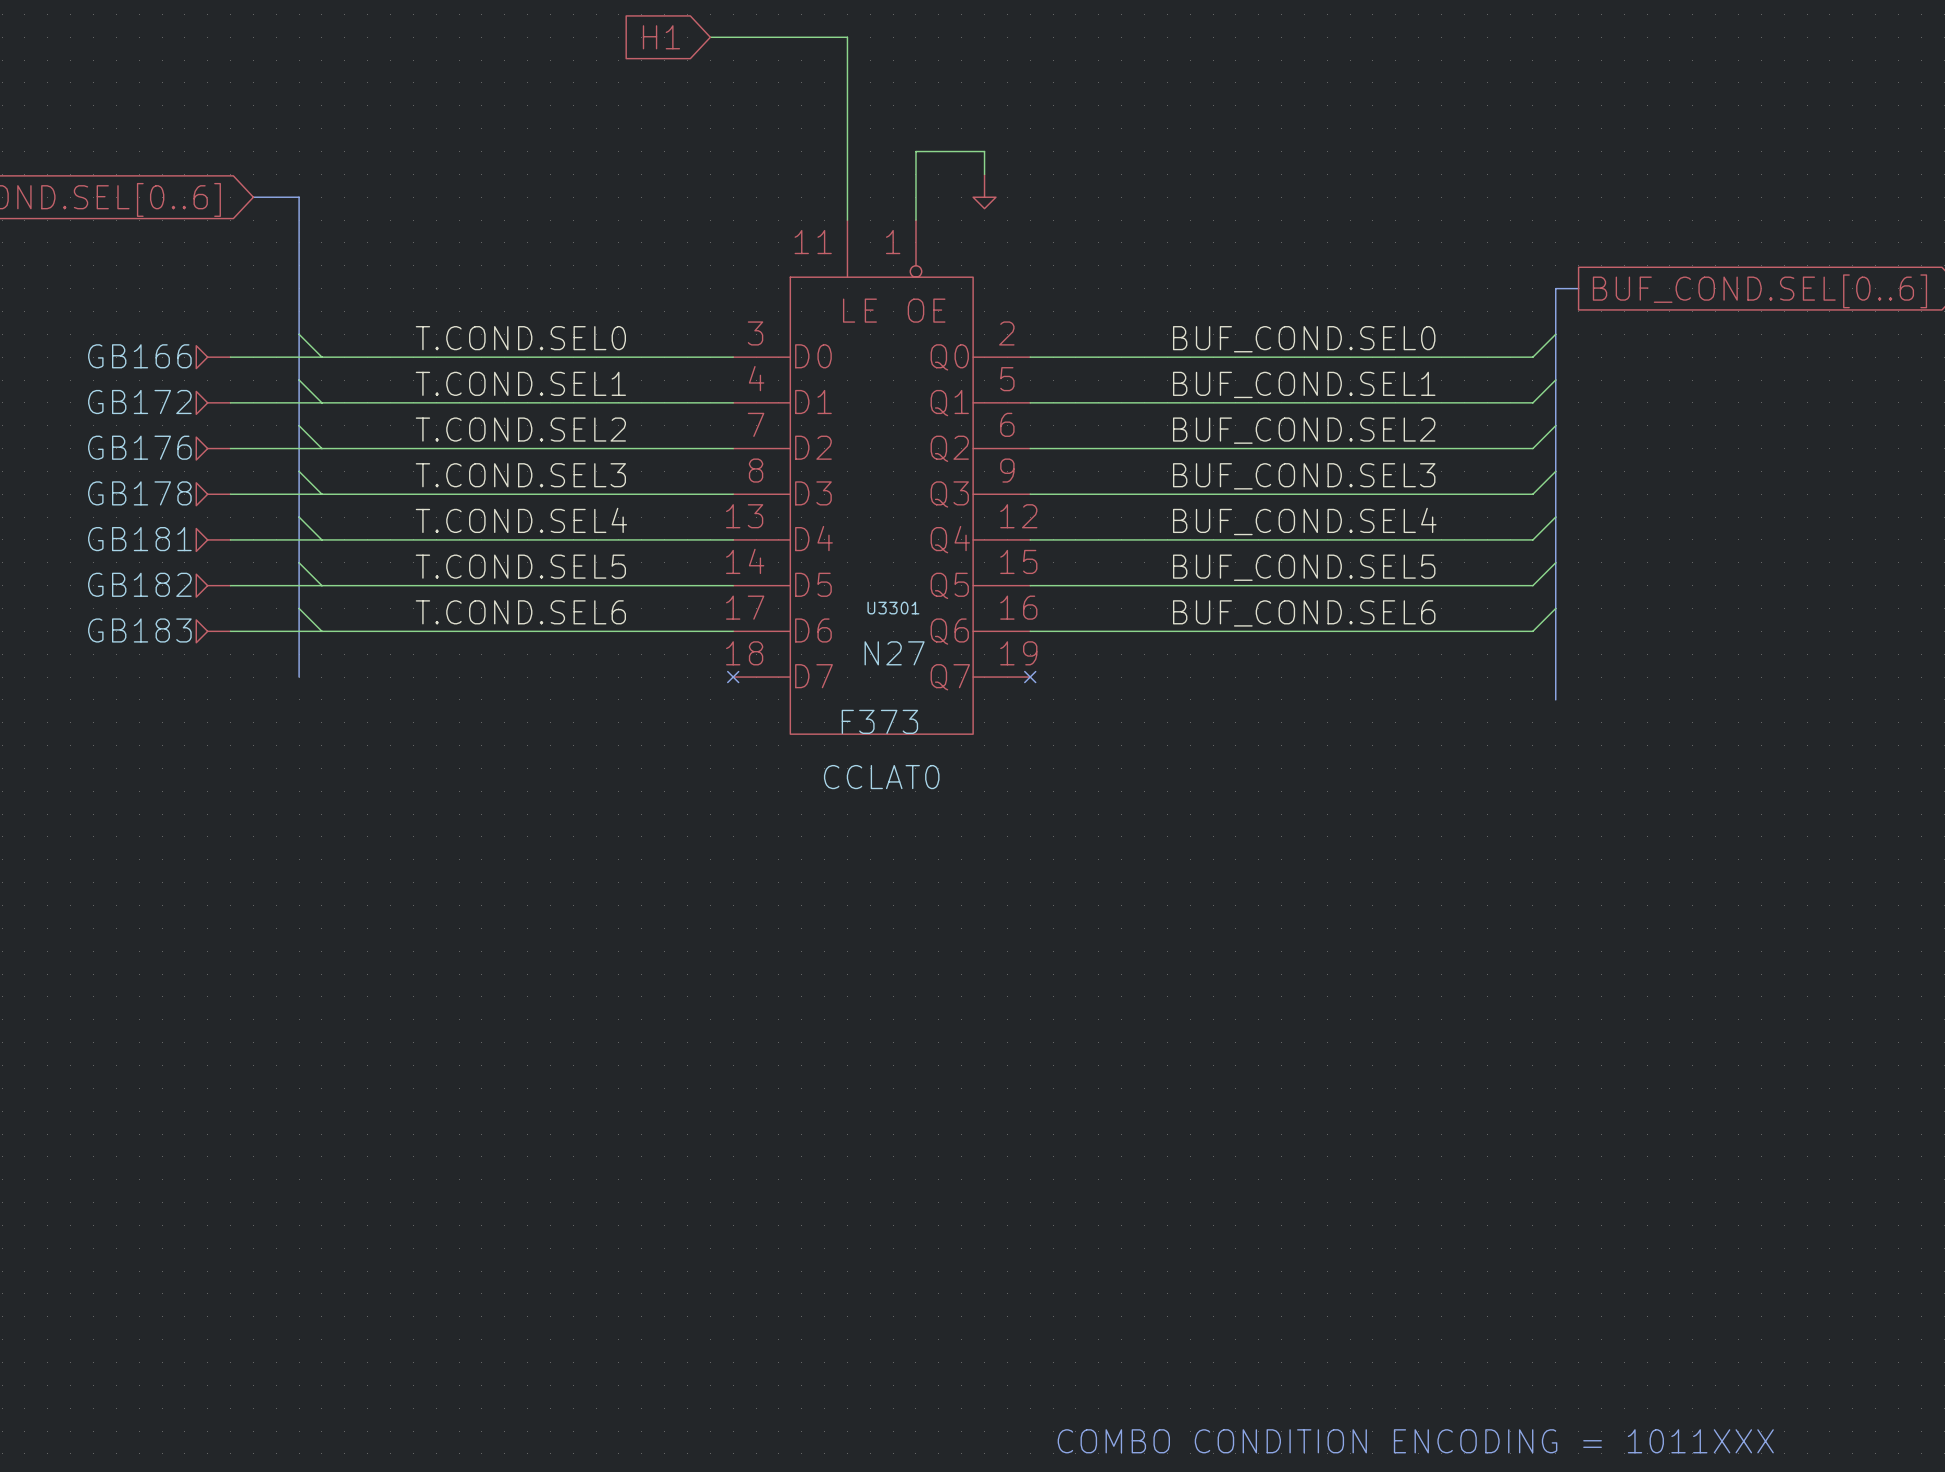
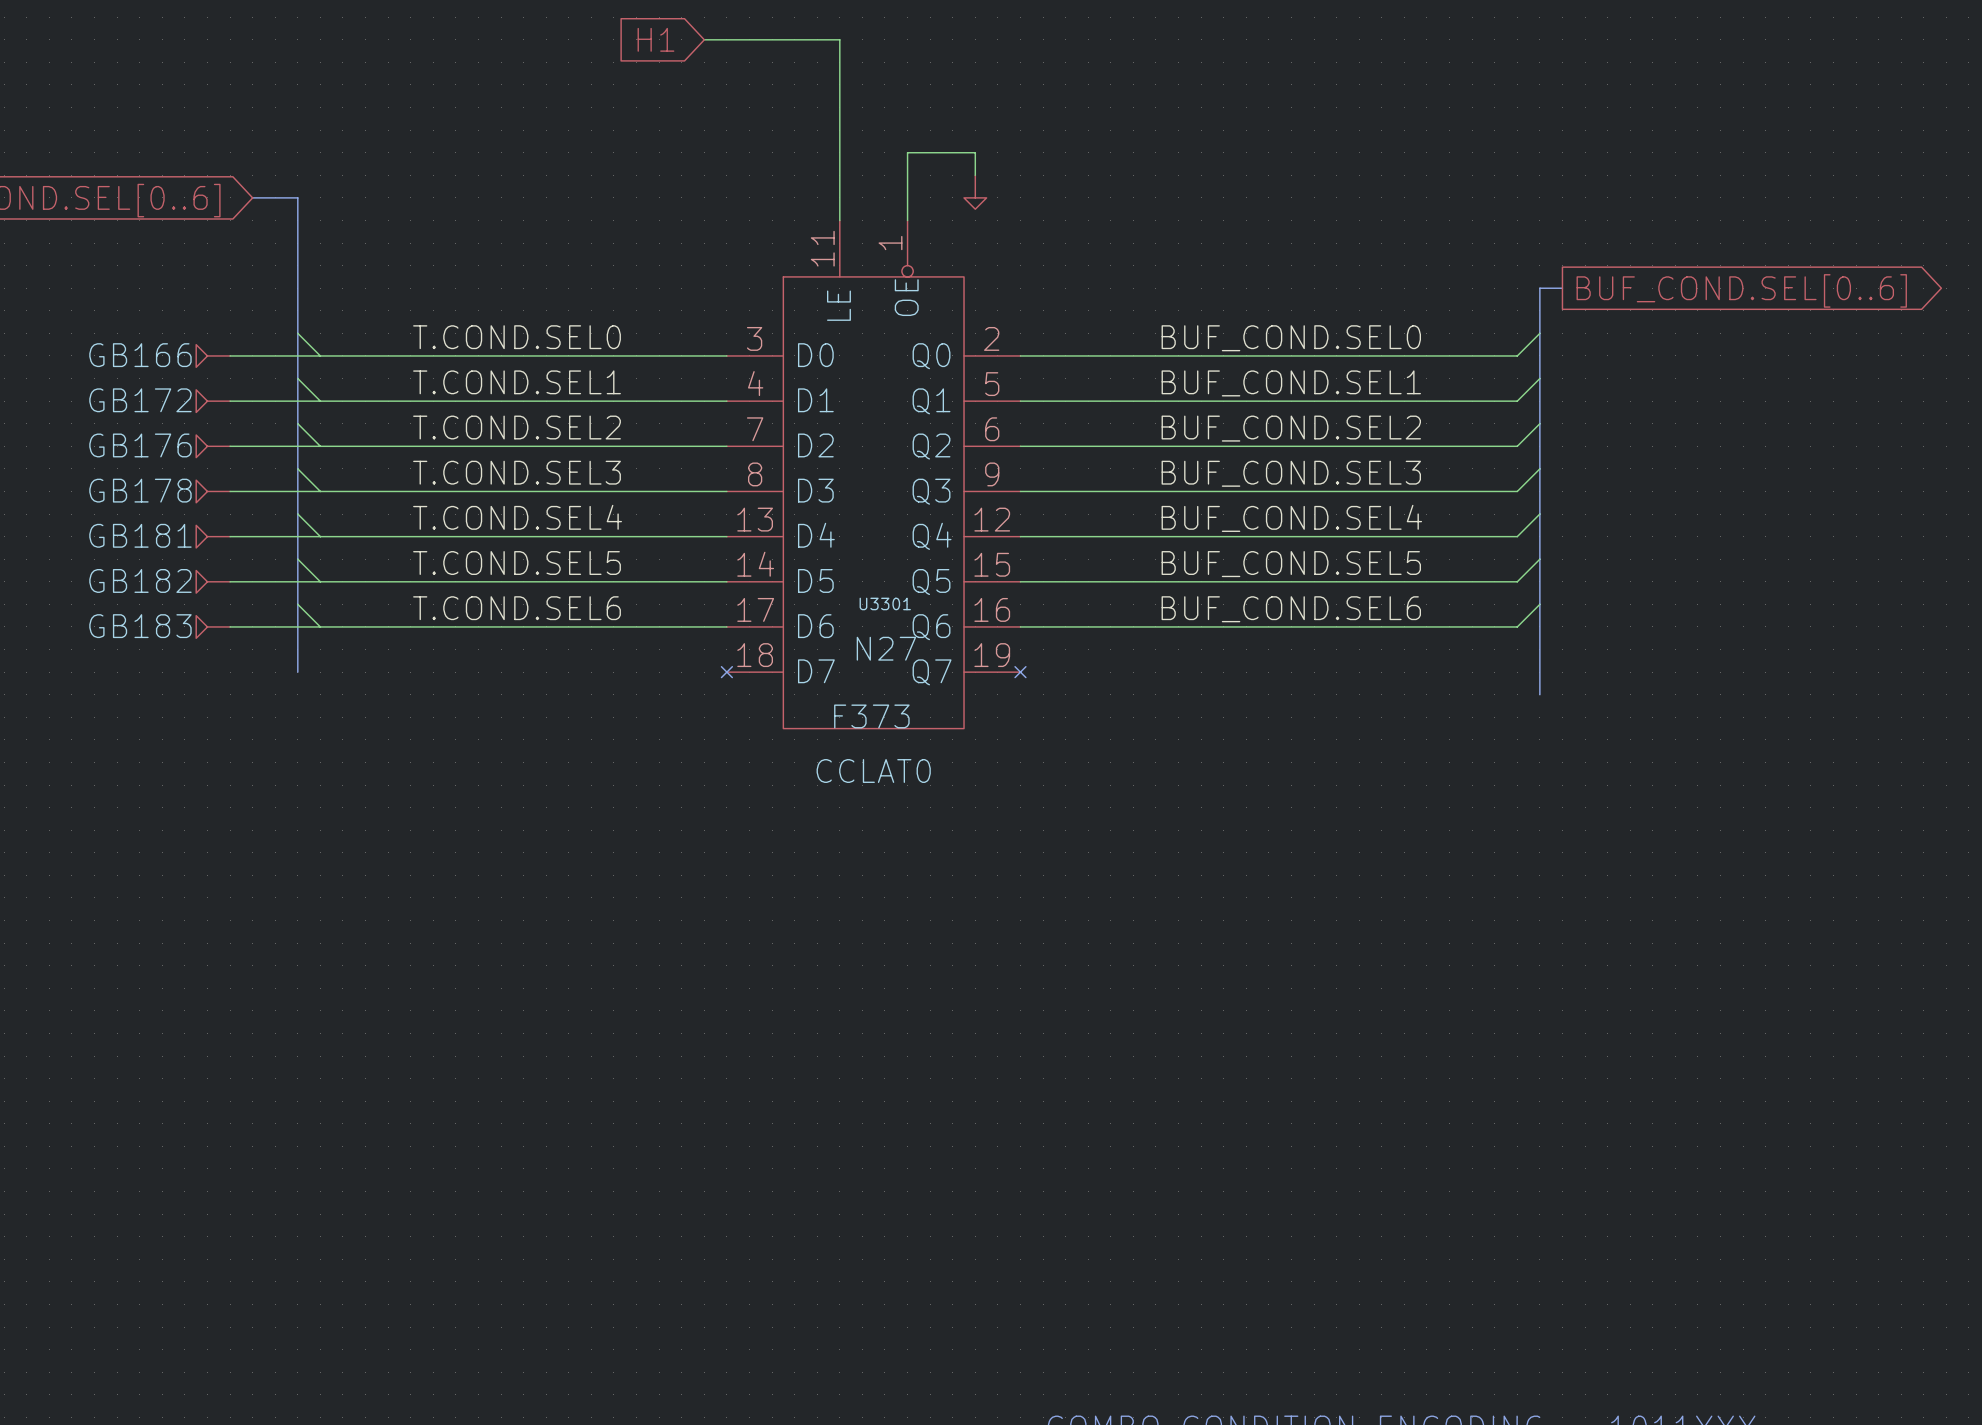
U3301 symbol: [733, 220, 1031, 735] -> [726, 220, 1021, 729]

